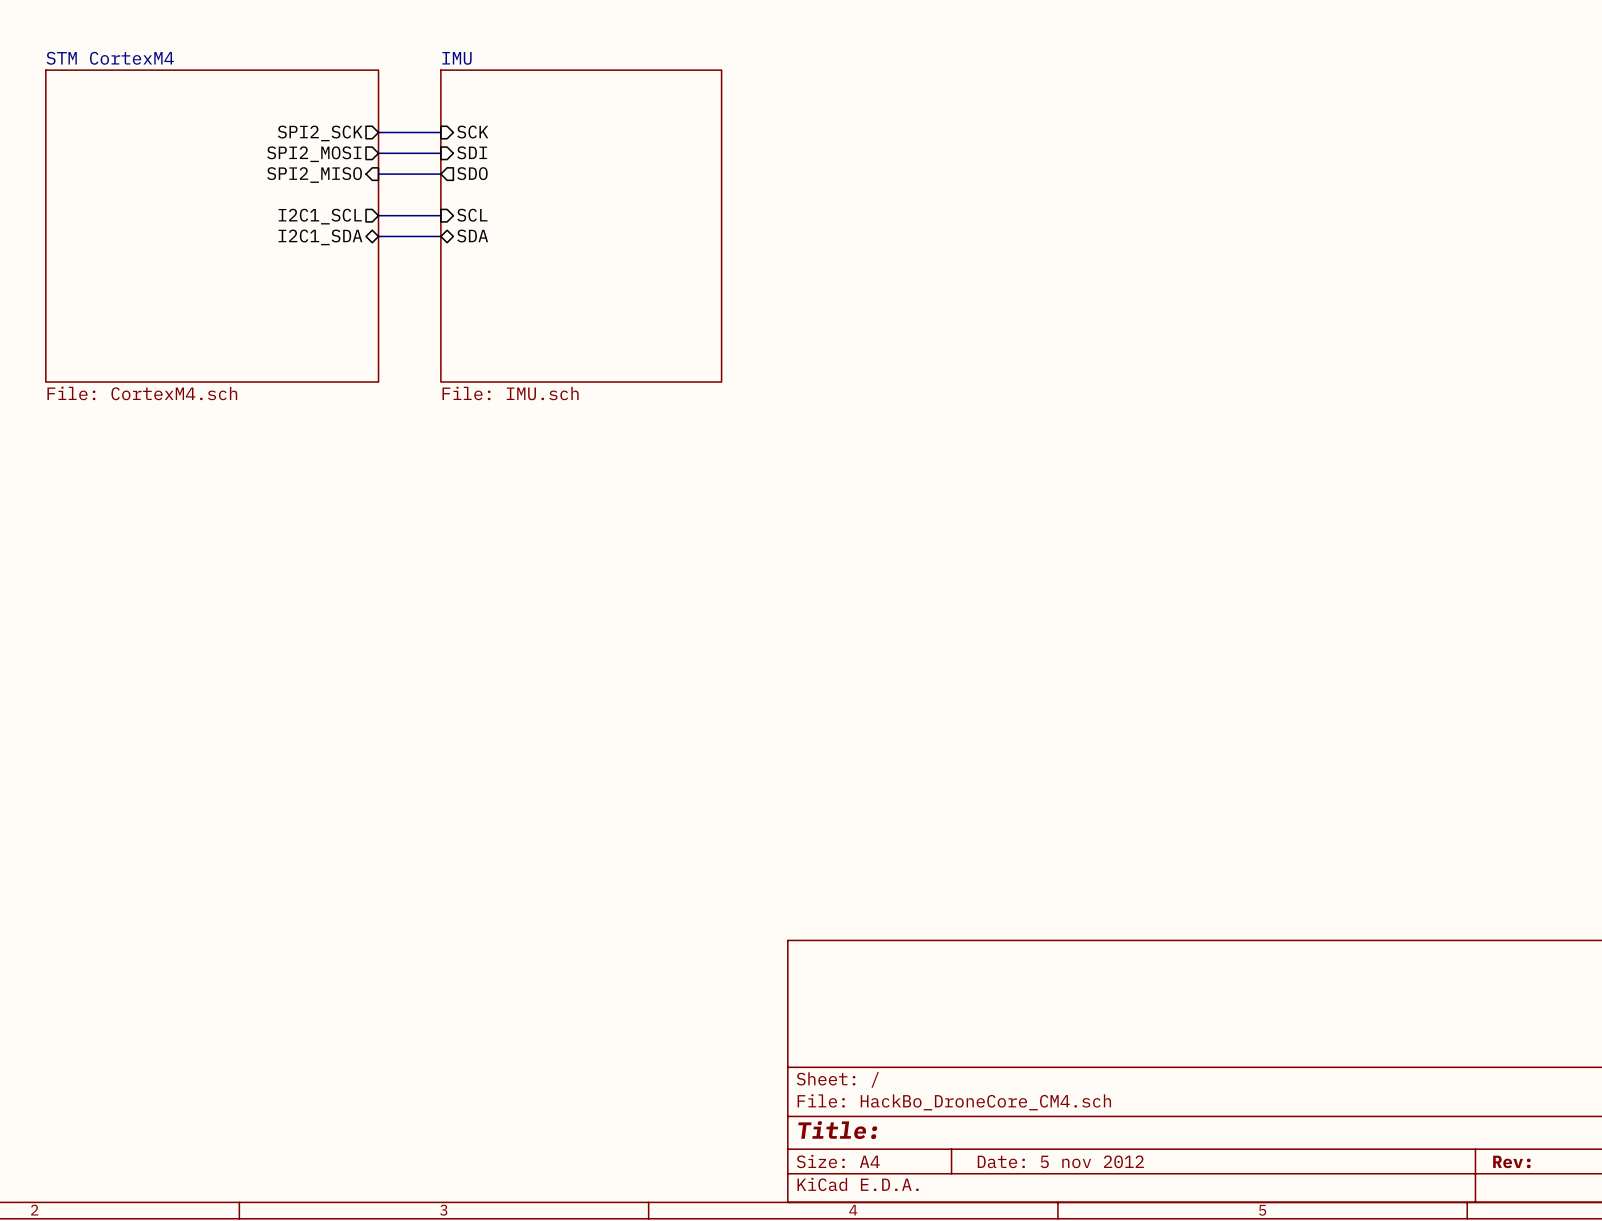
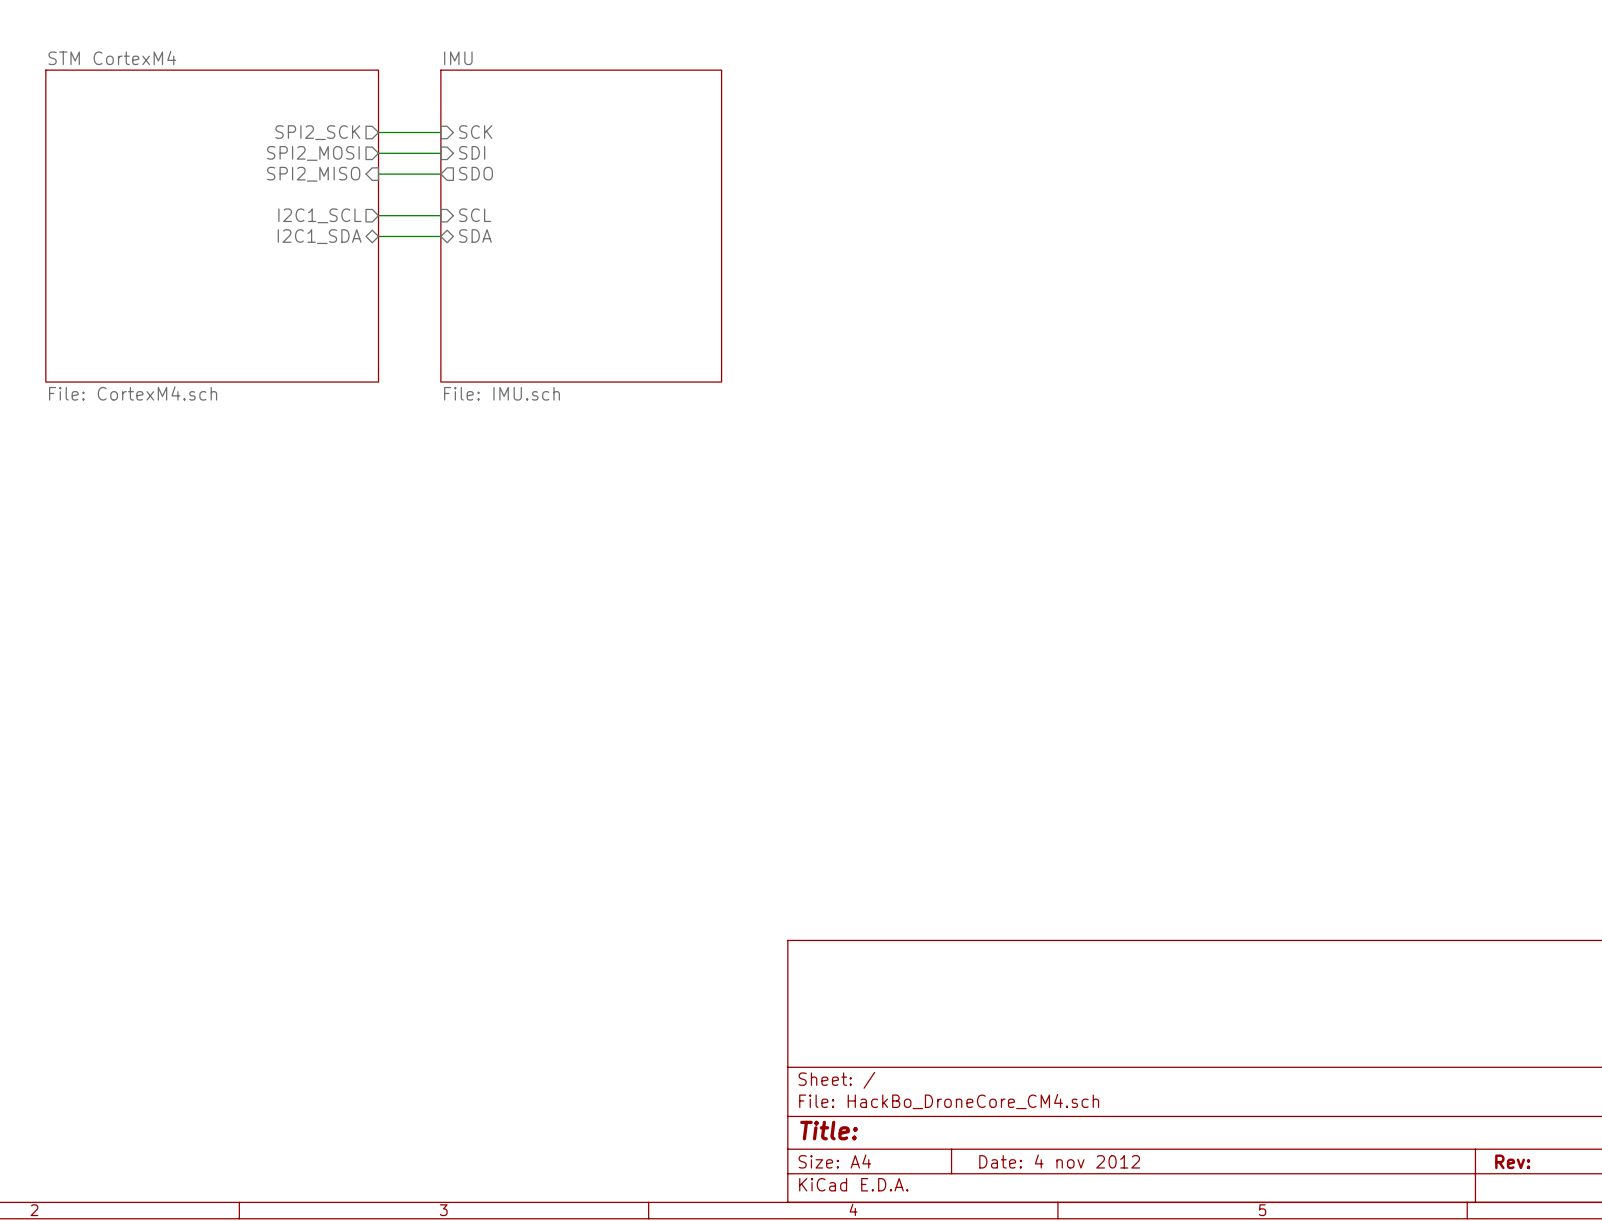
title block: Date: 5 nov 2012 (1060, 1161) -> Date: 4 nov 2012 (1059, 1161)

